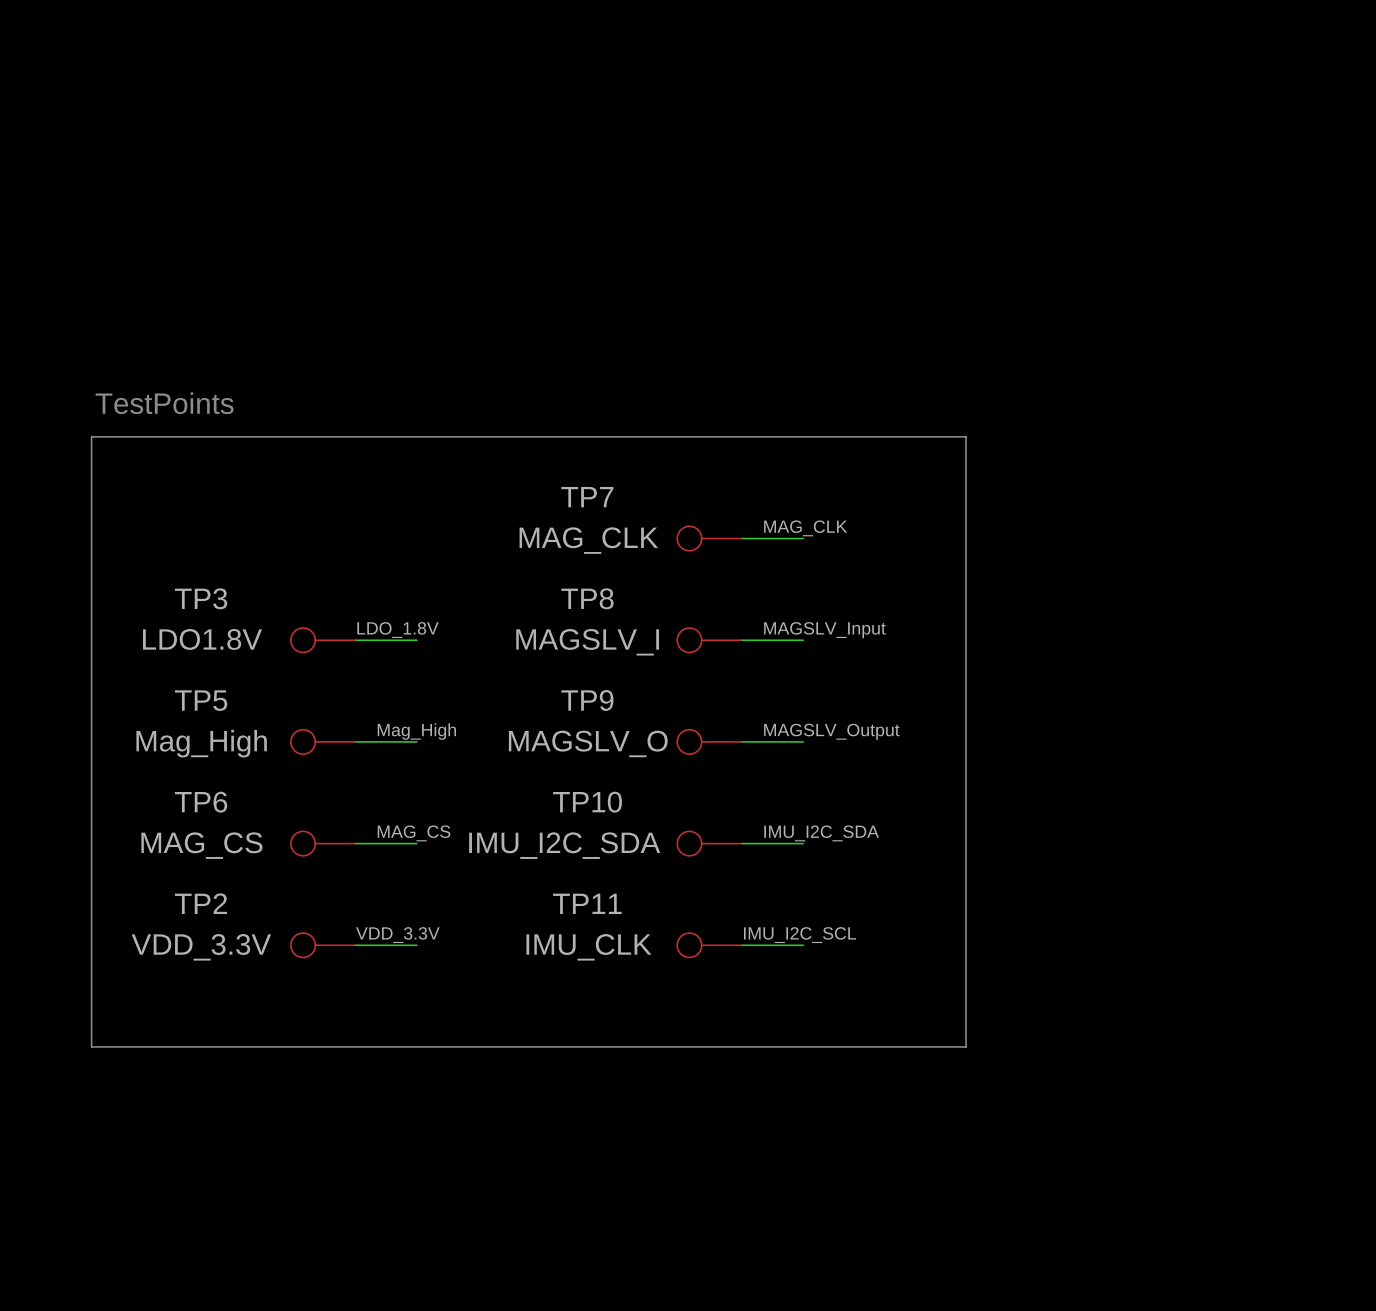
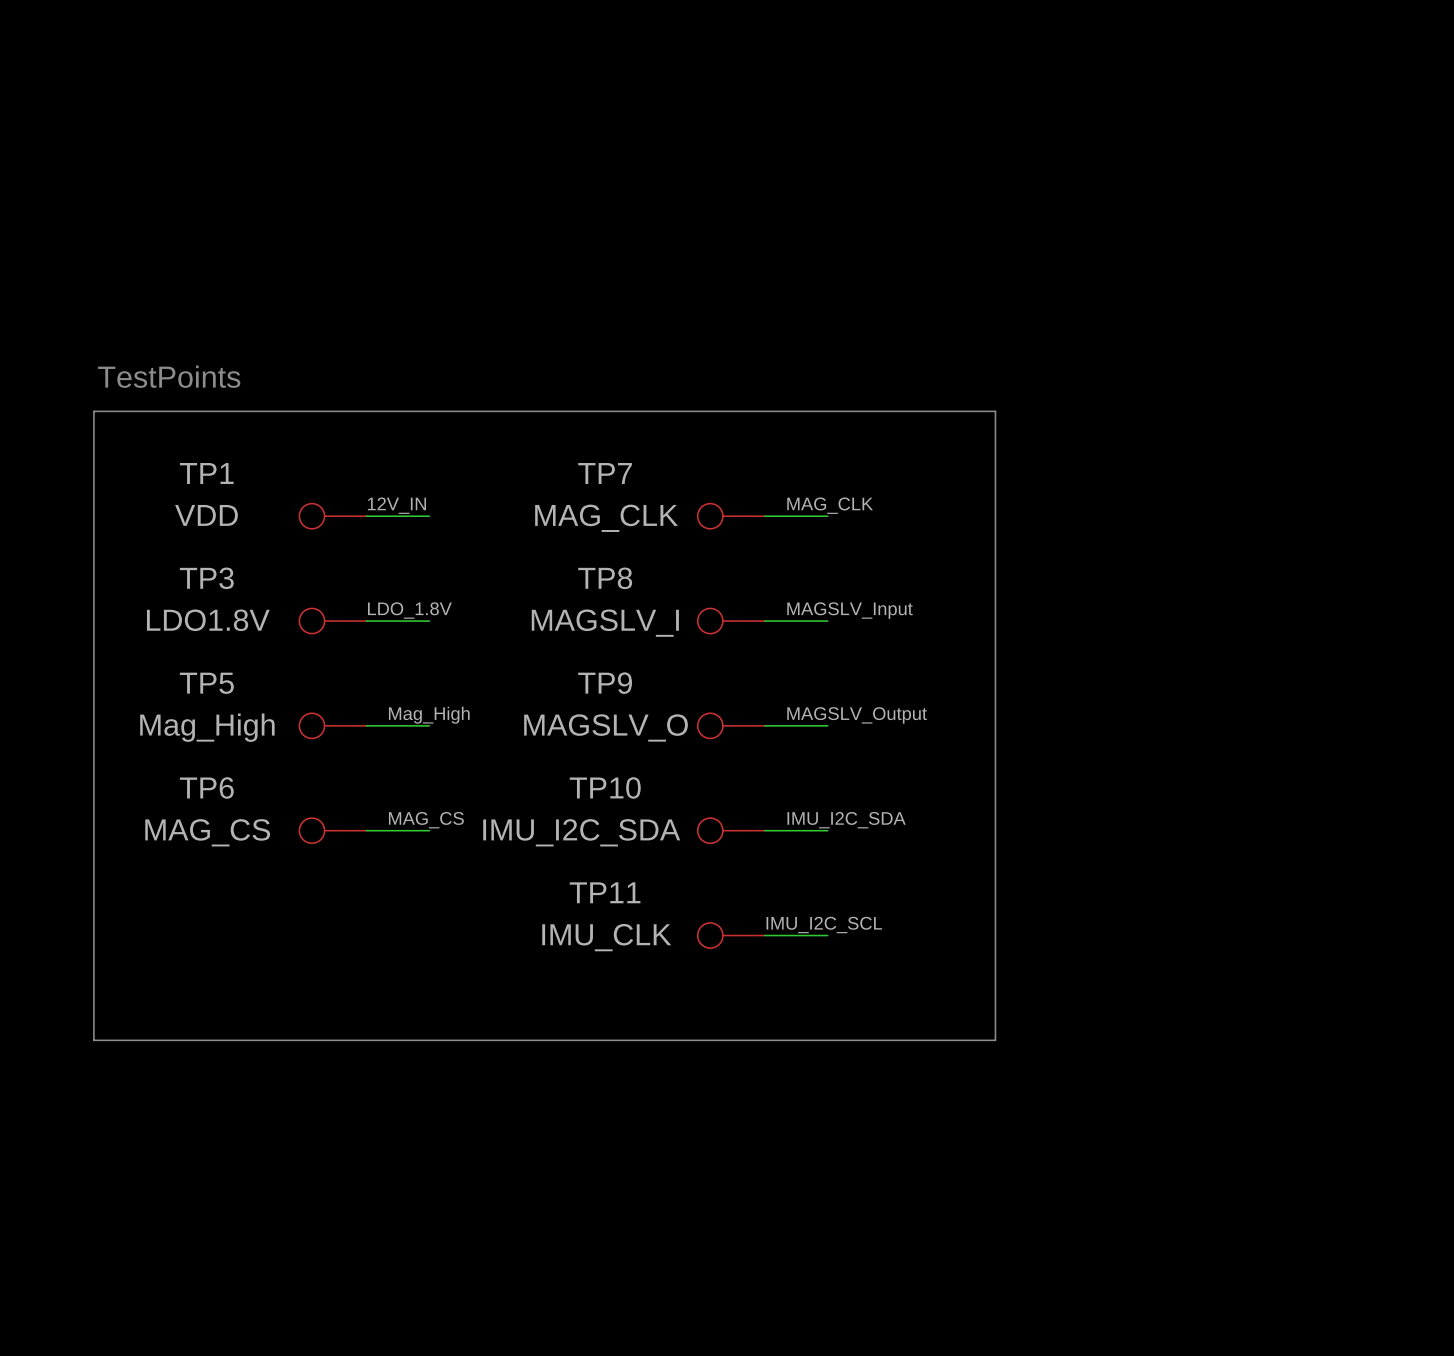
label: none -> 12V_IN (396, 505)
TP1: none -> VDD (332, 516)
wire: none -> (366, 516) (429, 516)
label: VDD_3.3V (397, 935) -> none
TP2: VDD_3.3V (323, 945) -> none
wire: (355, 945) (416, 945) -> none

